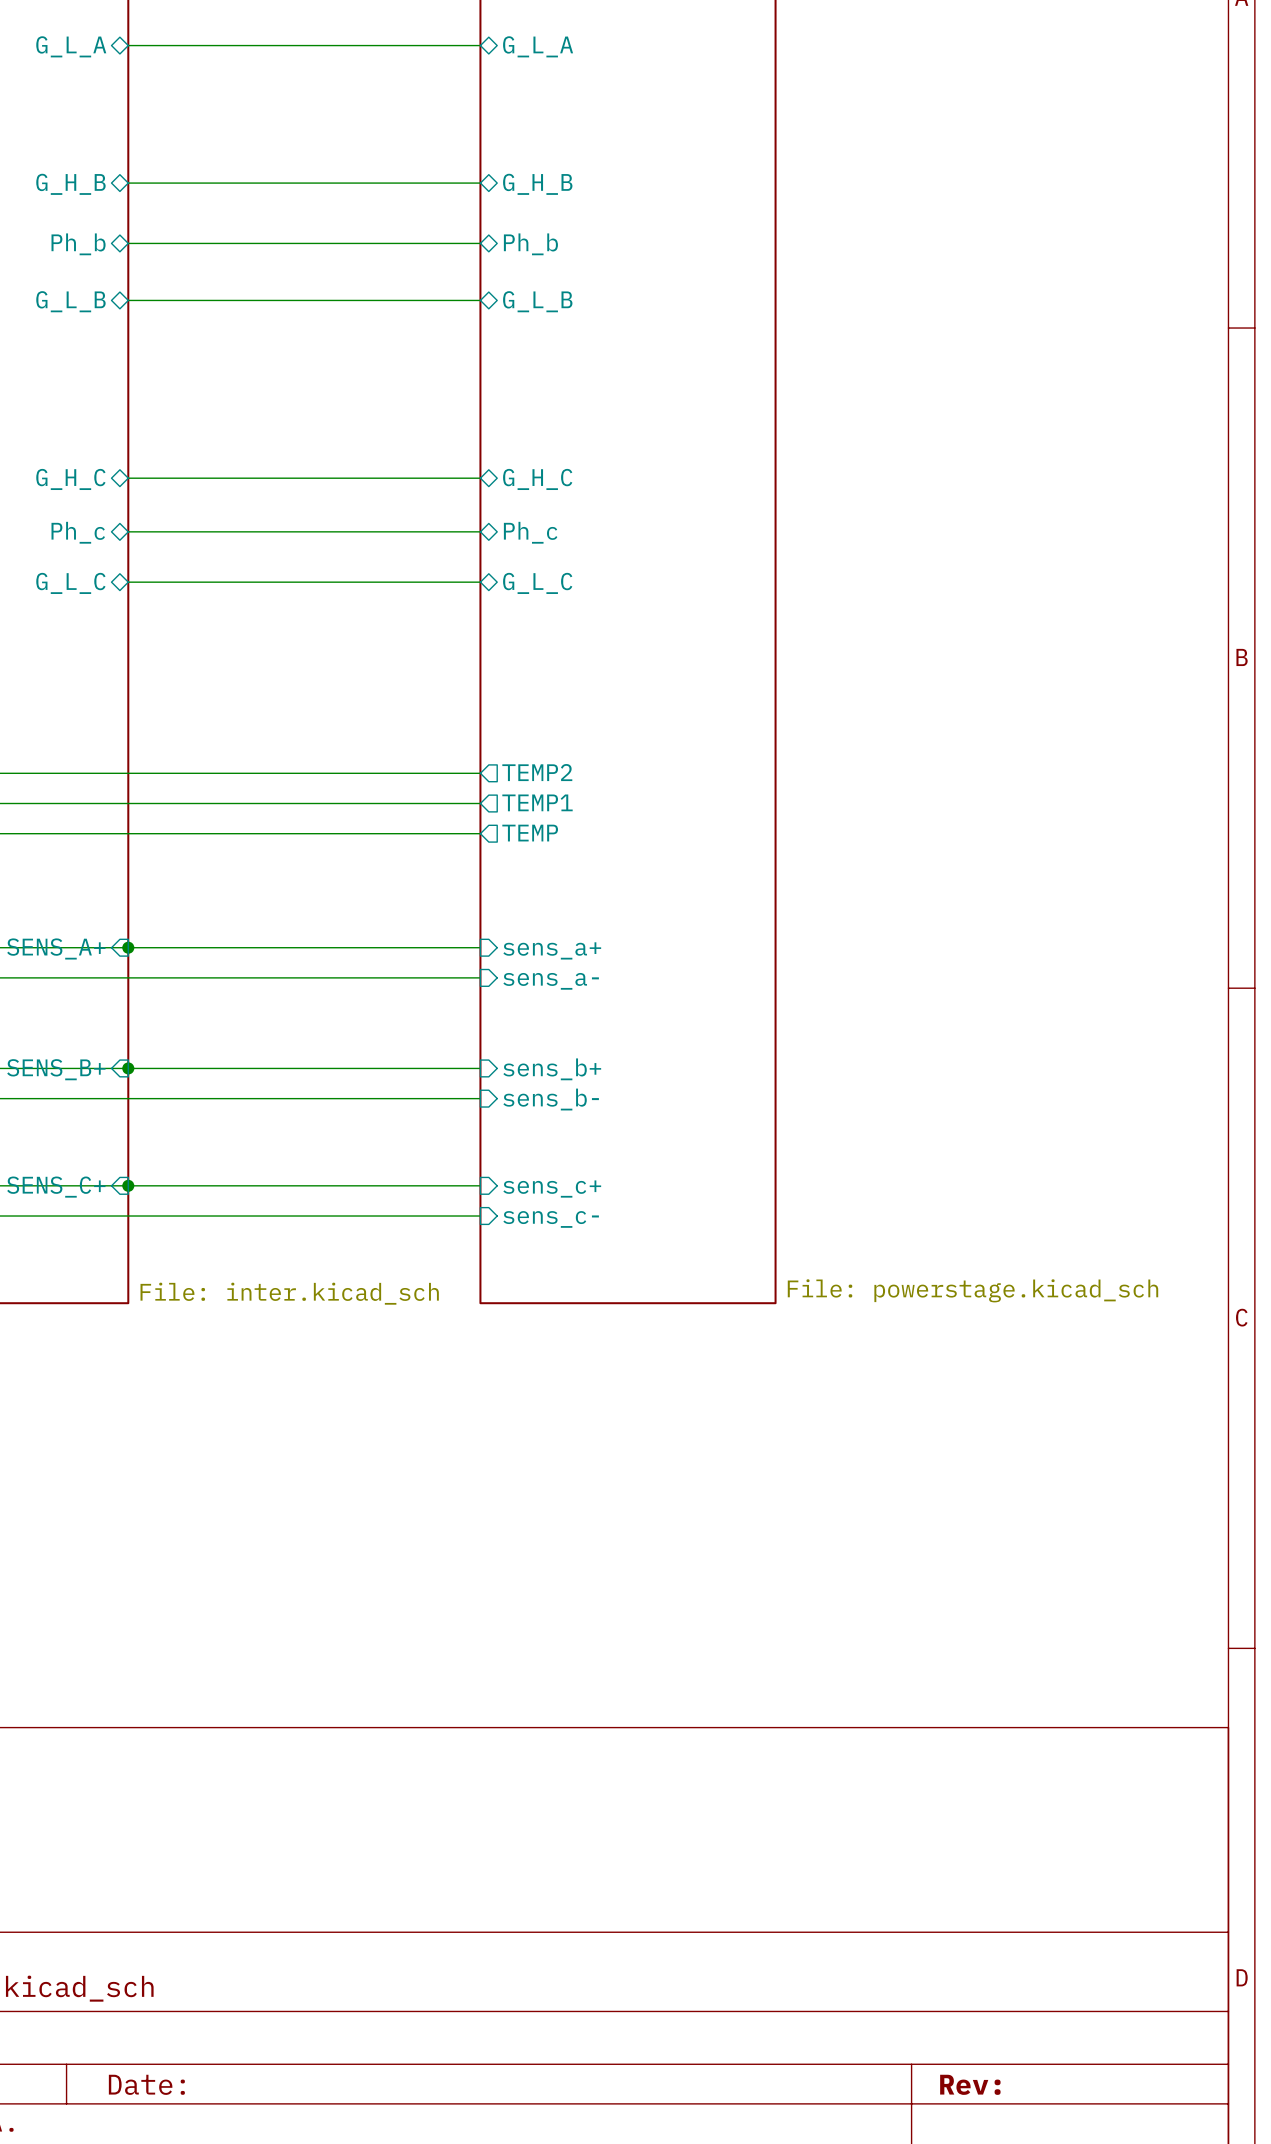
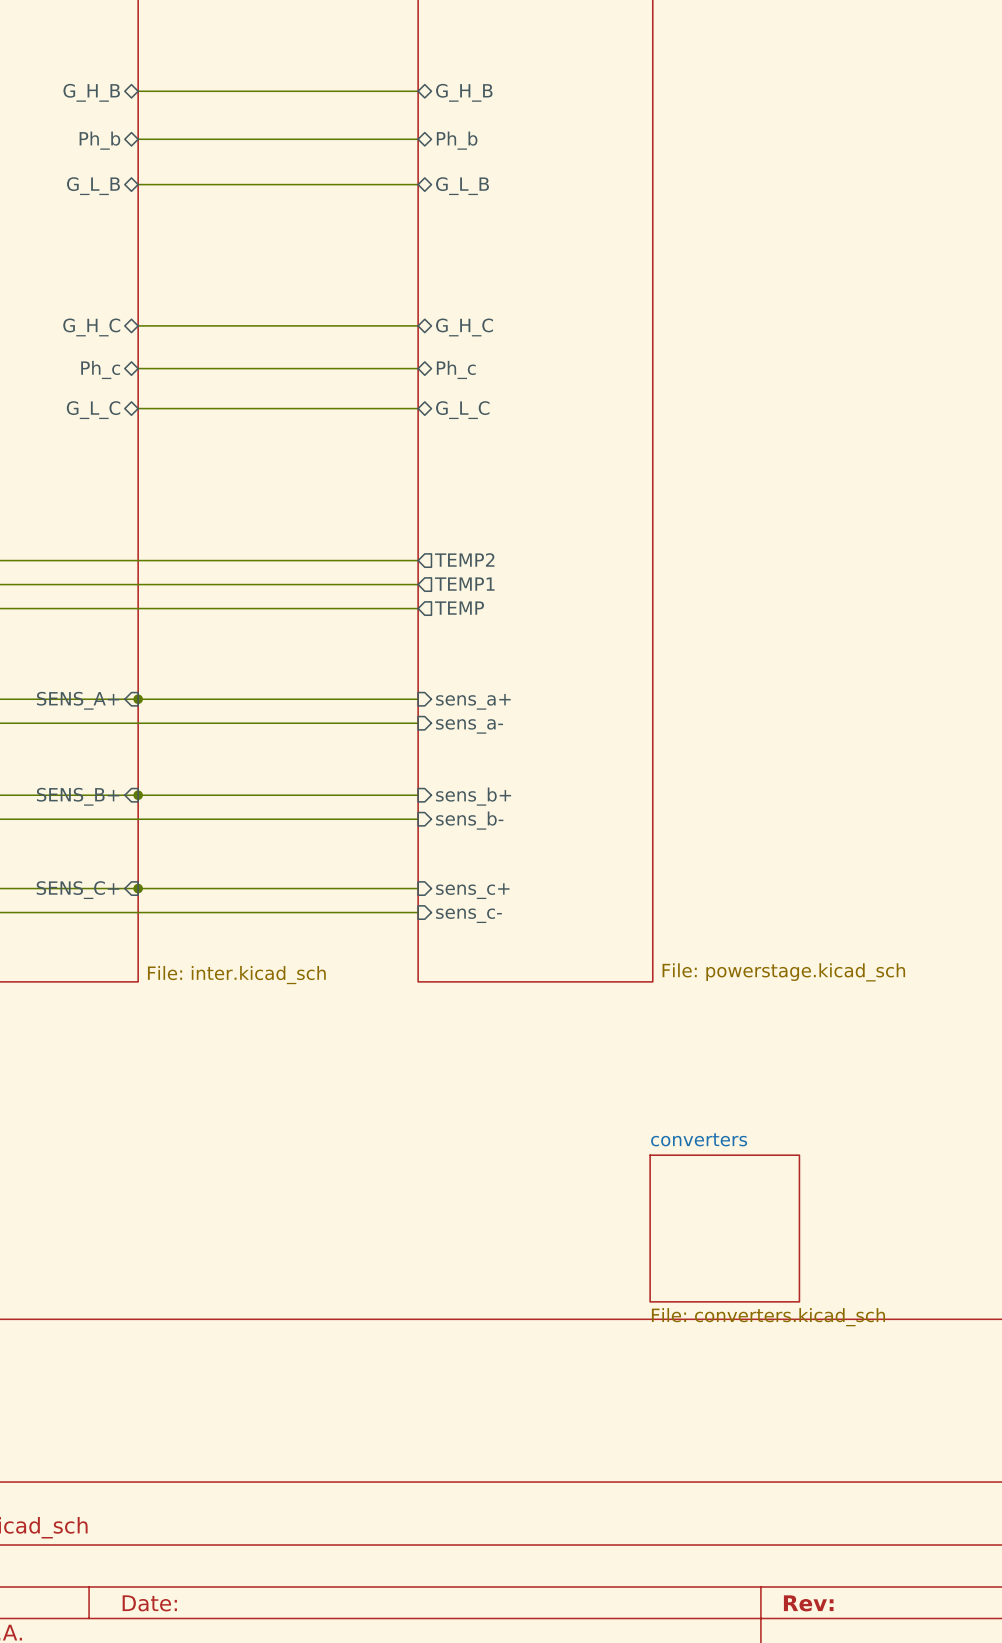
sheet converters: none -> File: converters.kicad_sch (724, 1228)

